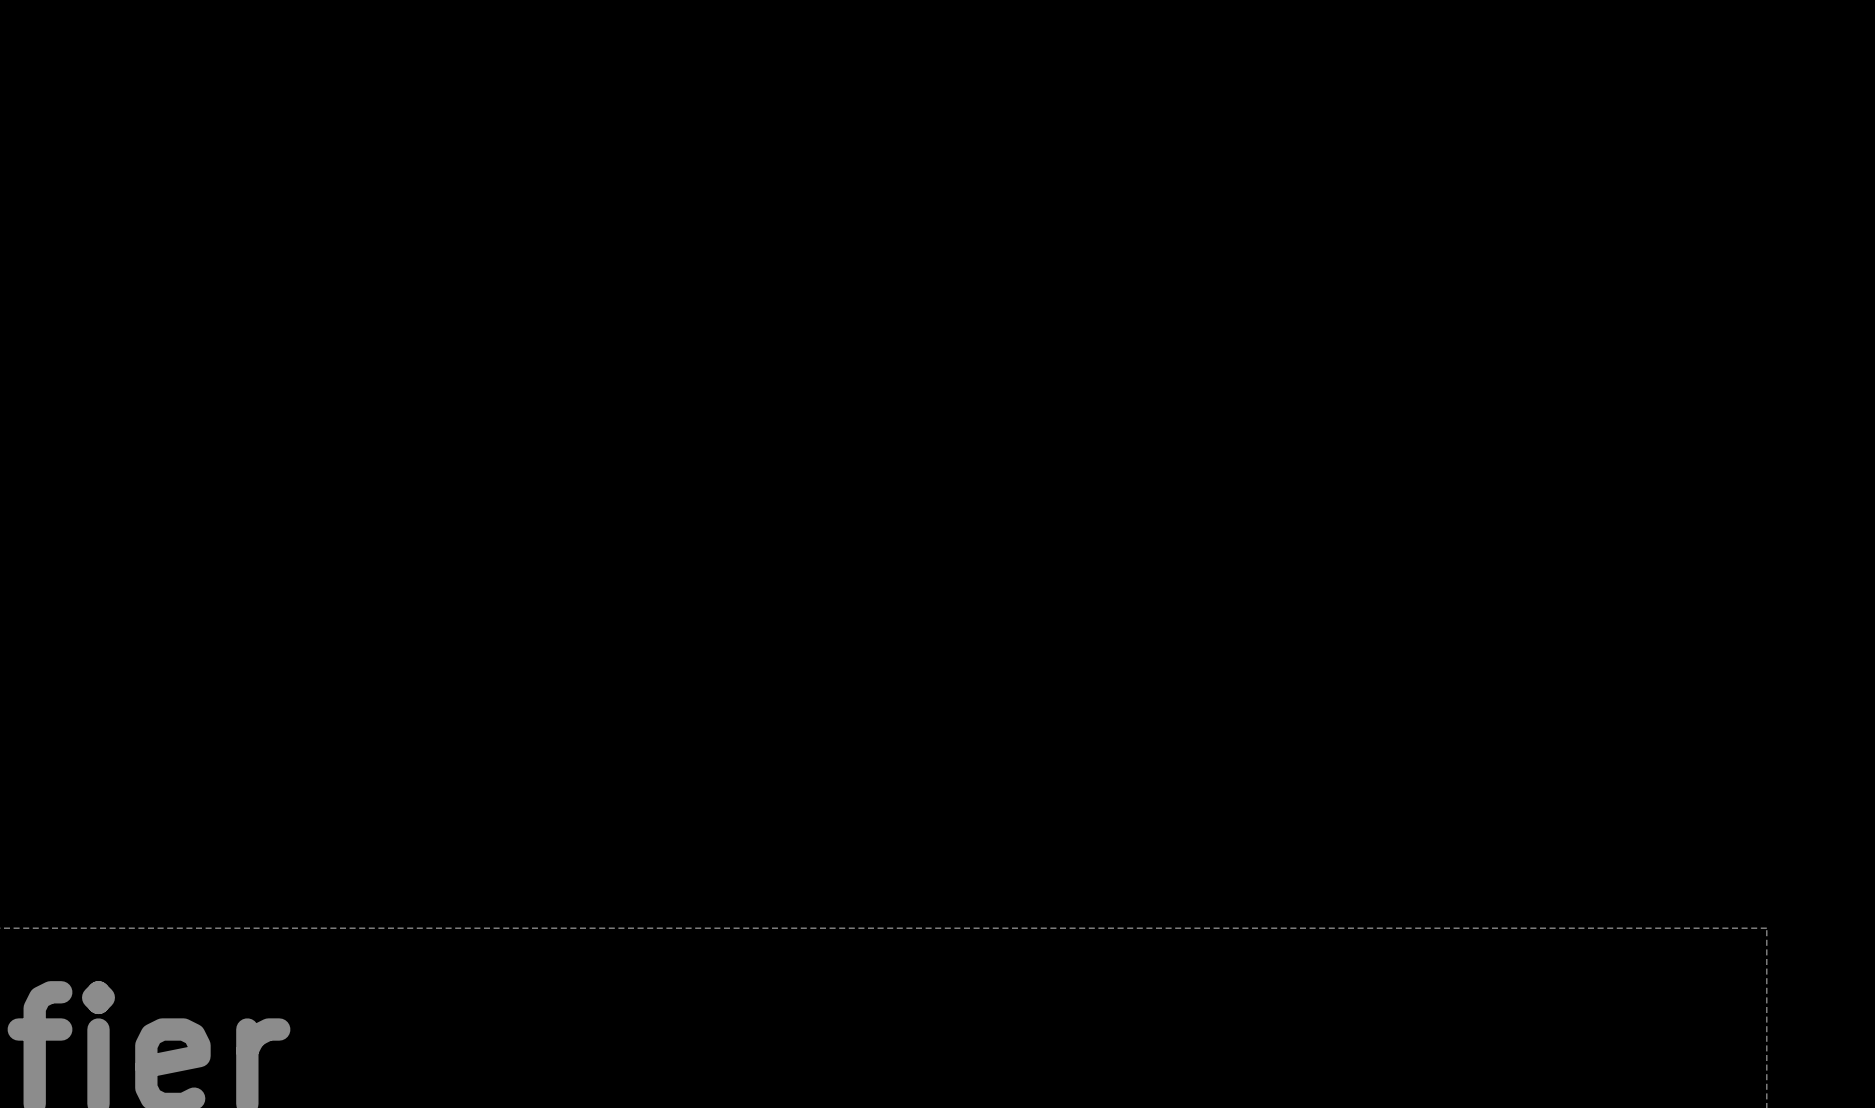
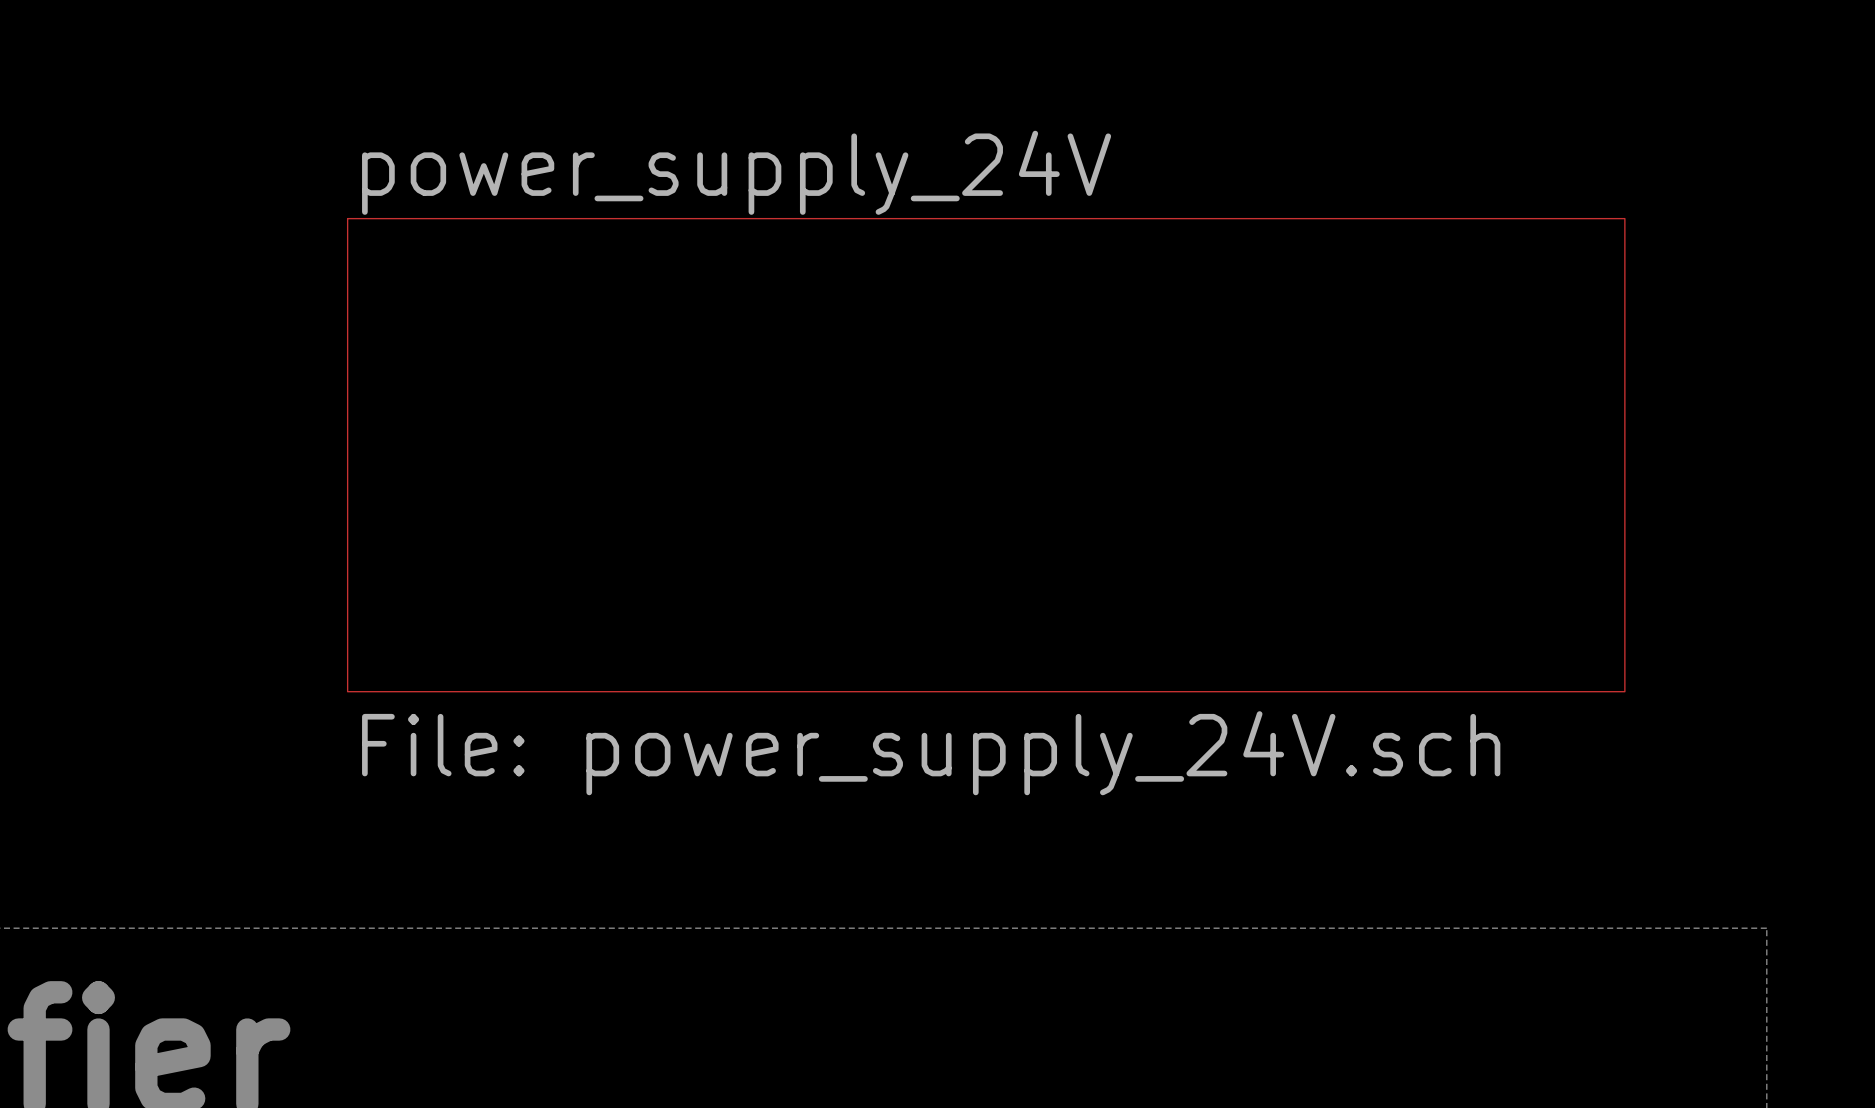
sheet power_supply_24V: none -> File: power_supply_24V.sch (986, 455)

